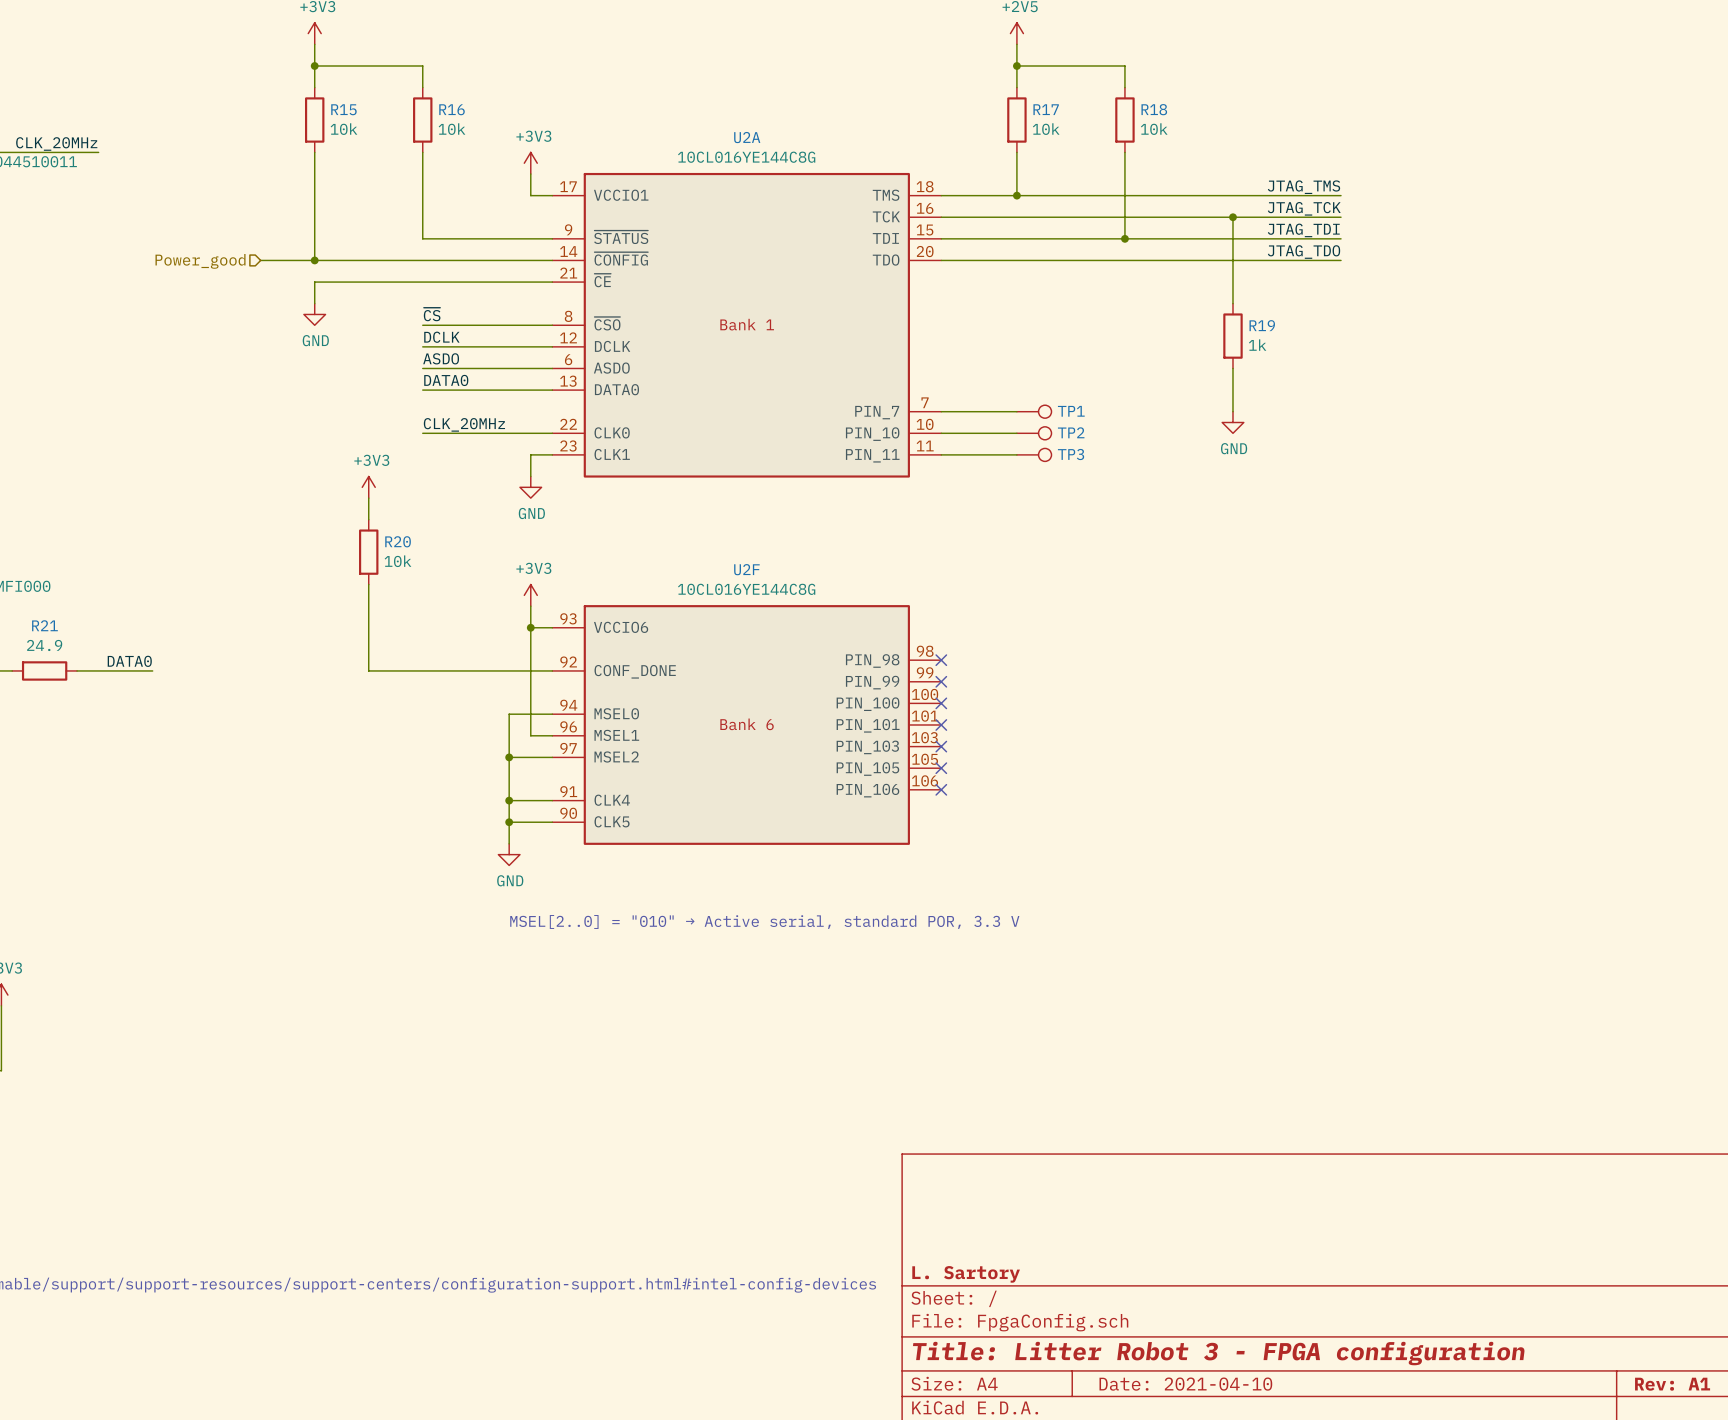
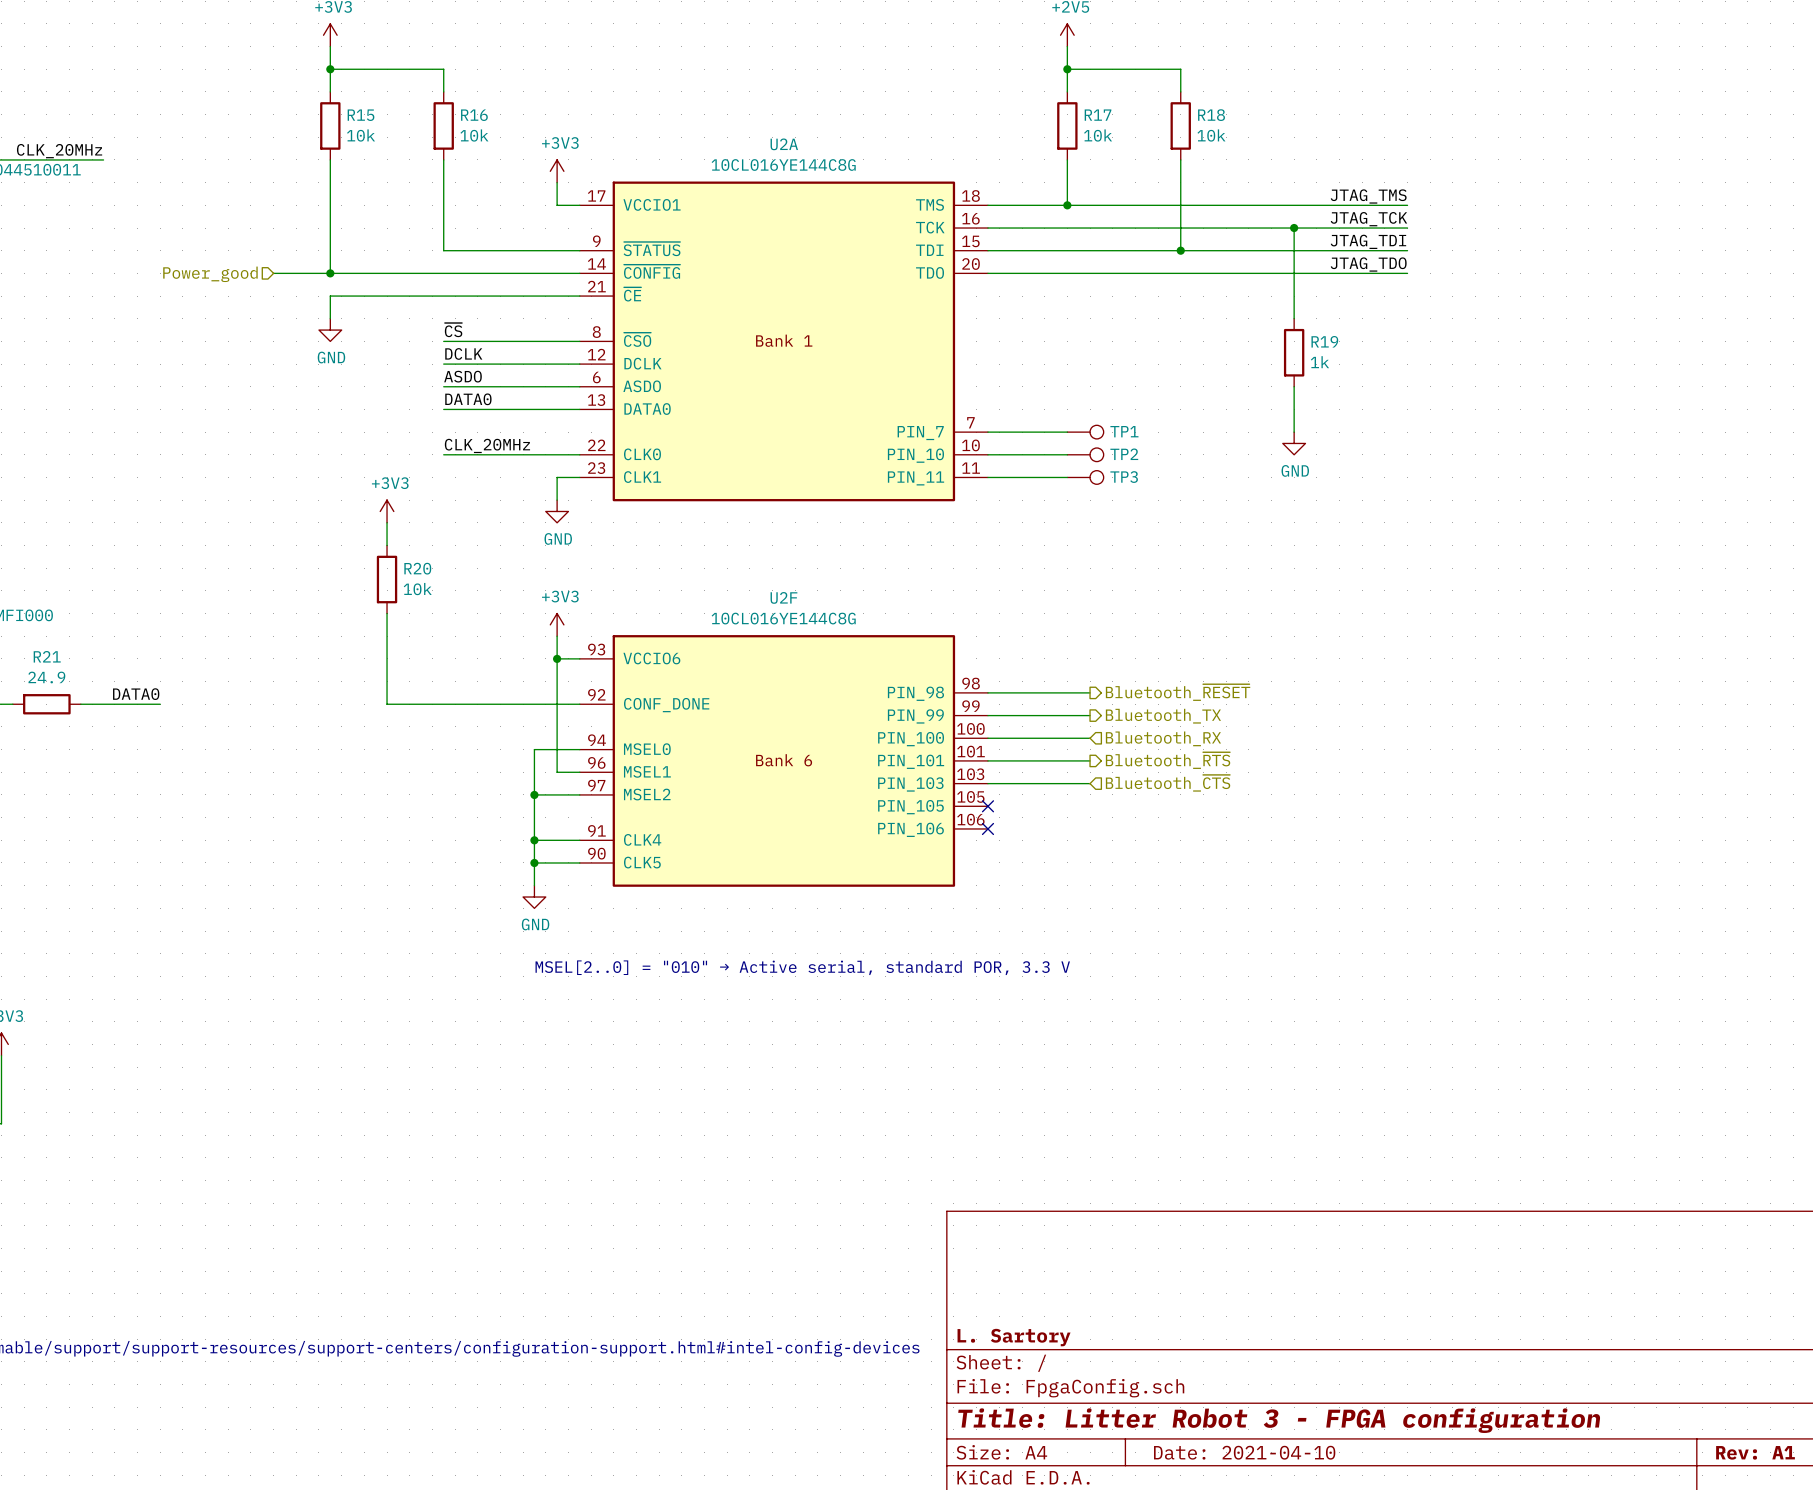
hierarchical label: none -> Bluetooth_~{RESET} (1178, 692)
wire: none -> (987, 692) (1090, 692)
no-connect mark: (941, 660) -> none
wire: none -> (987, 715) (1090, 715)
no-connect mark: (941, 681) -> none
hierarchical label: none -> Bluetooth_TX (1163, 716)
wire: none -> (987, 738) (1090, 738)
no-connect mark: (941, 703) -> none
hierarchical label: none -> Bluetooth_RX (1163, 738)
wire: none -> (987, 760) (1090, 760)
no-connect mark: (941, 724) -> none
hierarchical label: none -> Bluetooth_~{RTS} (1168, 760)
wire: none -> (987, 783) (1090, 783)
no-connect mark: (941, 746) -> none
hierarchical label: none -> Bluetooth_~{CTS} (1168, 783)

